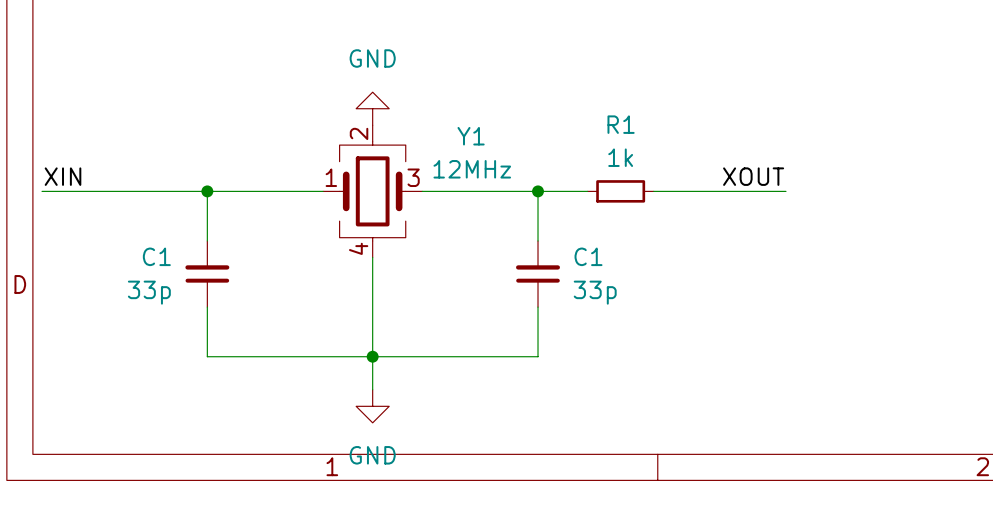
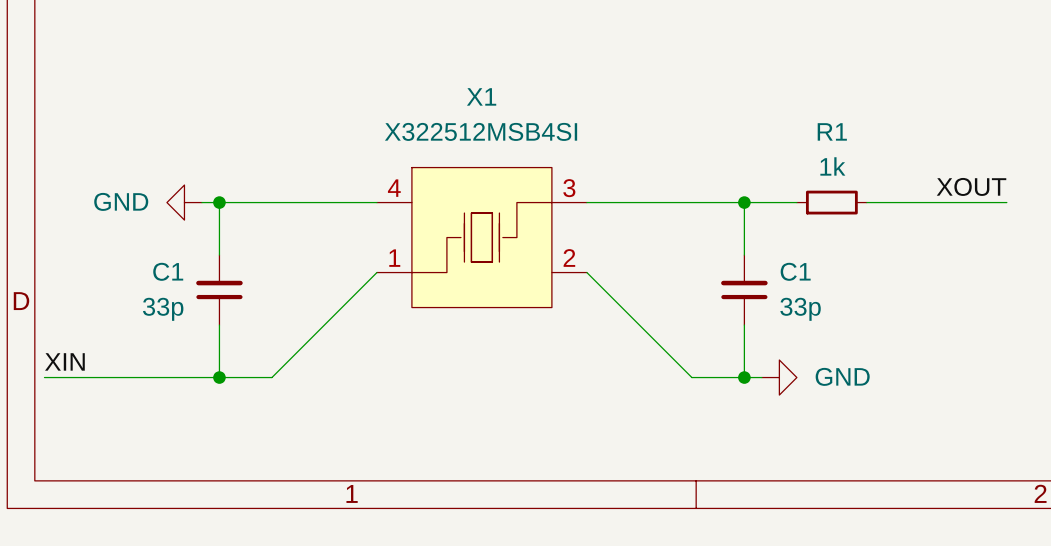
power symbol: GND (372, 108) -> none
label position: XIN (63, 176) -> XIN (64, 361)
label position: XOUT (753, 176) -> XOUT (971, 186)
wire: (42, 191) (190, 191) -> none
power symbol: none -> GND (184, 202)
Y1: 12MHz (372, 191) -> none
wire: (538, 191) (538, 240) -> (744, 202) (744, 255)
junction: (538, 191) -> none
wire: none -> (621, 202) (691, 202)
R1 position: (620, 191) -> (831, 202)
junction: none -> (744, 202)
wire: (752, 191) (785, 191) -> none
wire: none -> (866, 202) (1006, 202)
X1: none -> X322512MSB4SI (481, 237)
wire: (372, 257) (372, 389) -> none
wire: none -> (586, 272) (691, 377) (761, 377)
C1 position: (538, 274) -> (744, 290)
wire: (538, 307) (538, 356) (256, 356) -> (376, 272) (271, 377)
wire: none -> (744, 325) (744, 377)
wire: none -> (44, 377) (219, 377)
junction: none -> (219, 377)
junction: (372, 356) -> none
junction: none -> (744, 377)
power symbol: none -> GND (779, 377)
power symbol: GND (372, 406) -> none

